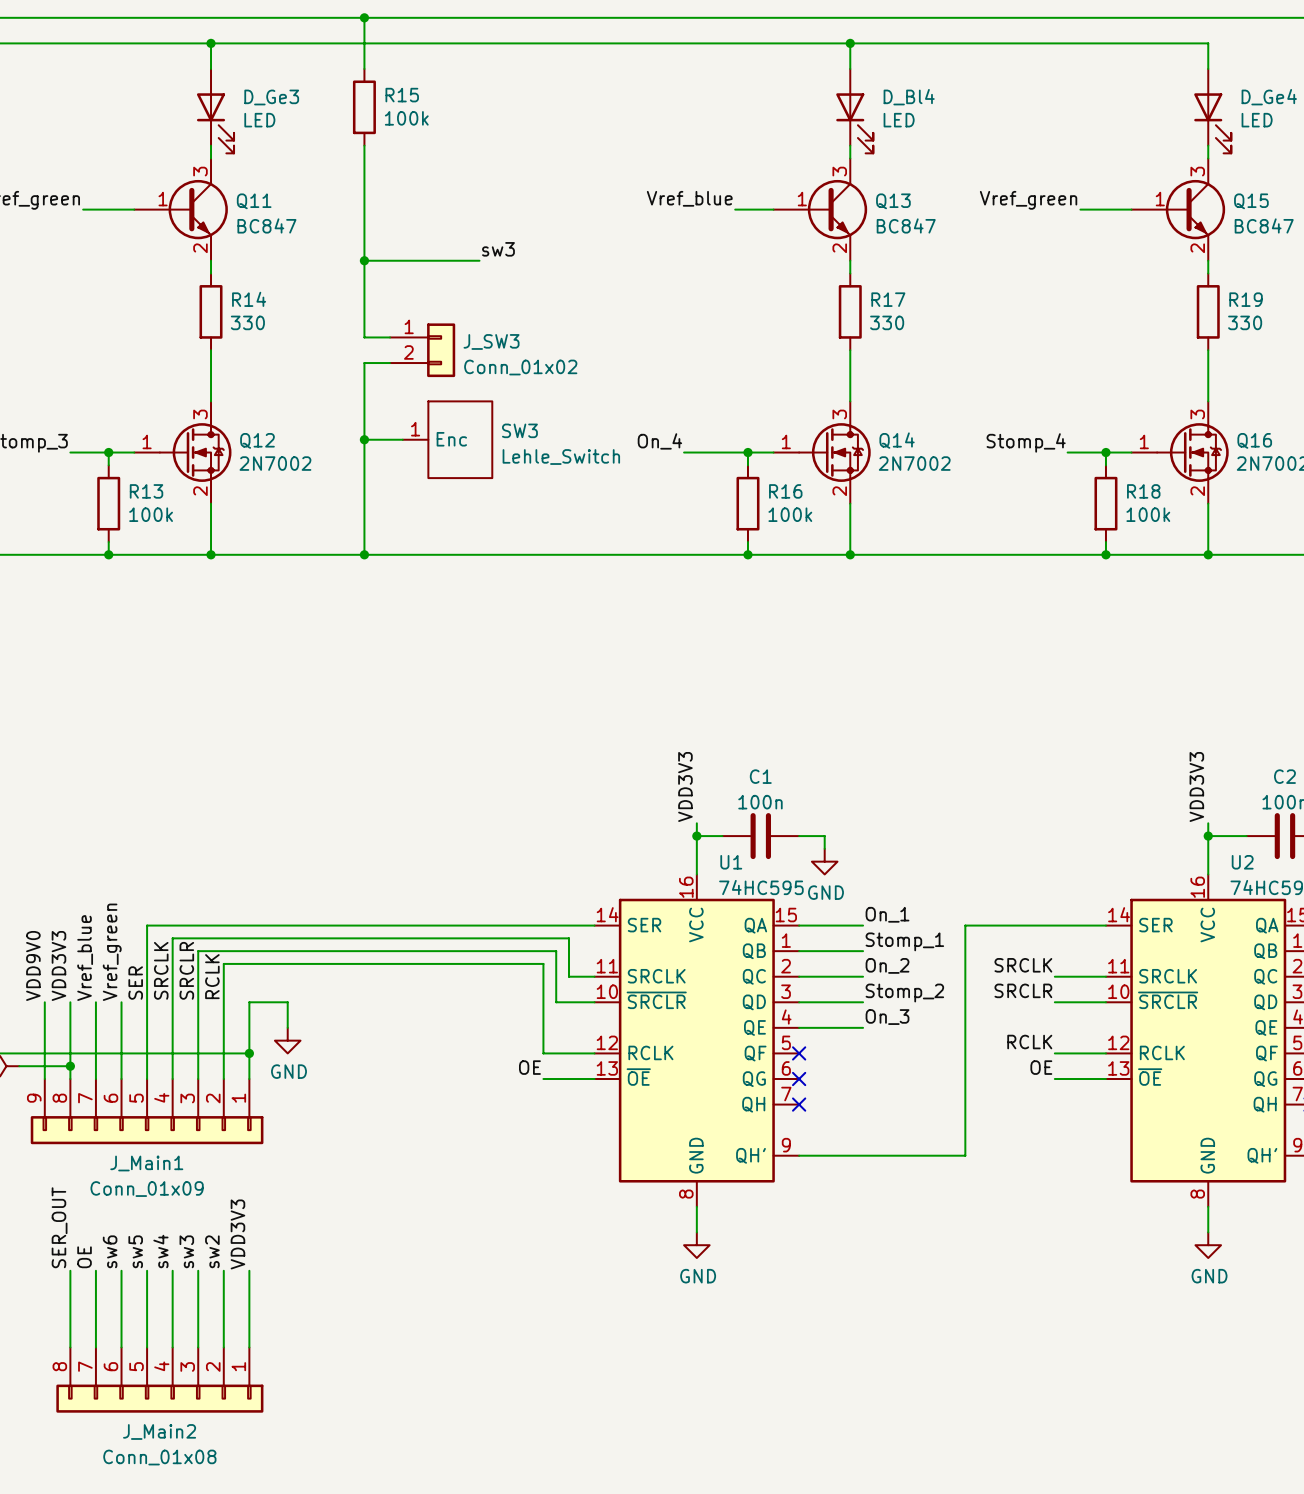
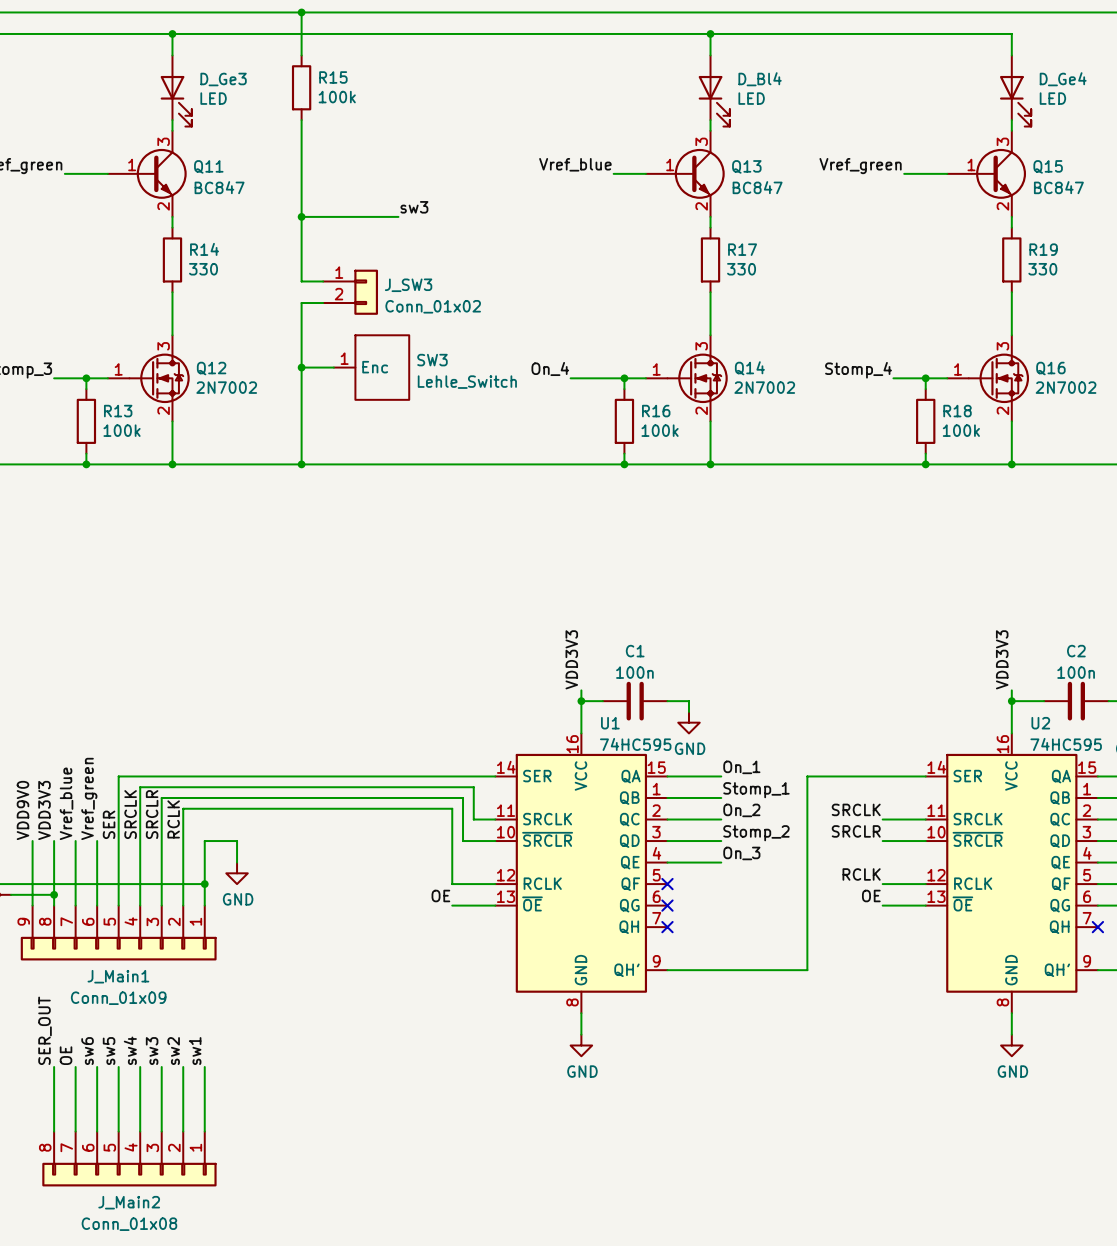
label: VDD3V3 (237, 1234) -> sw1 (195, 1051)

